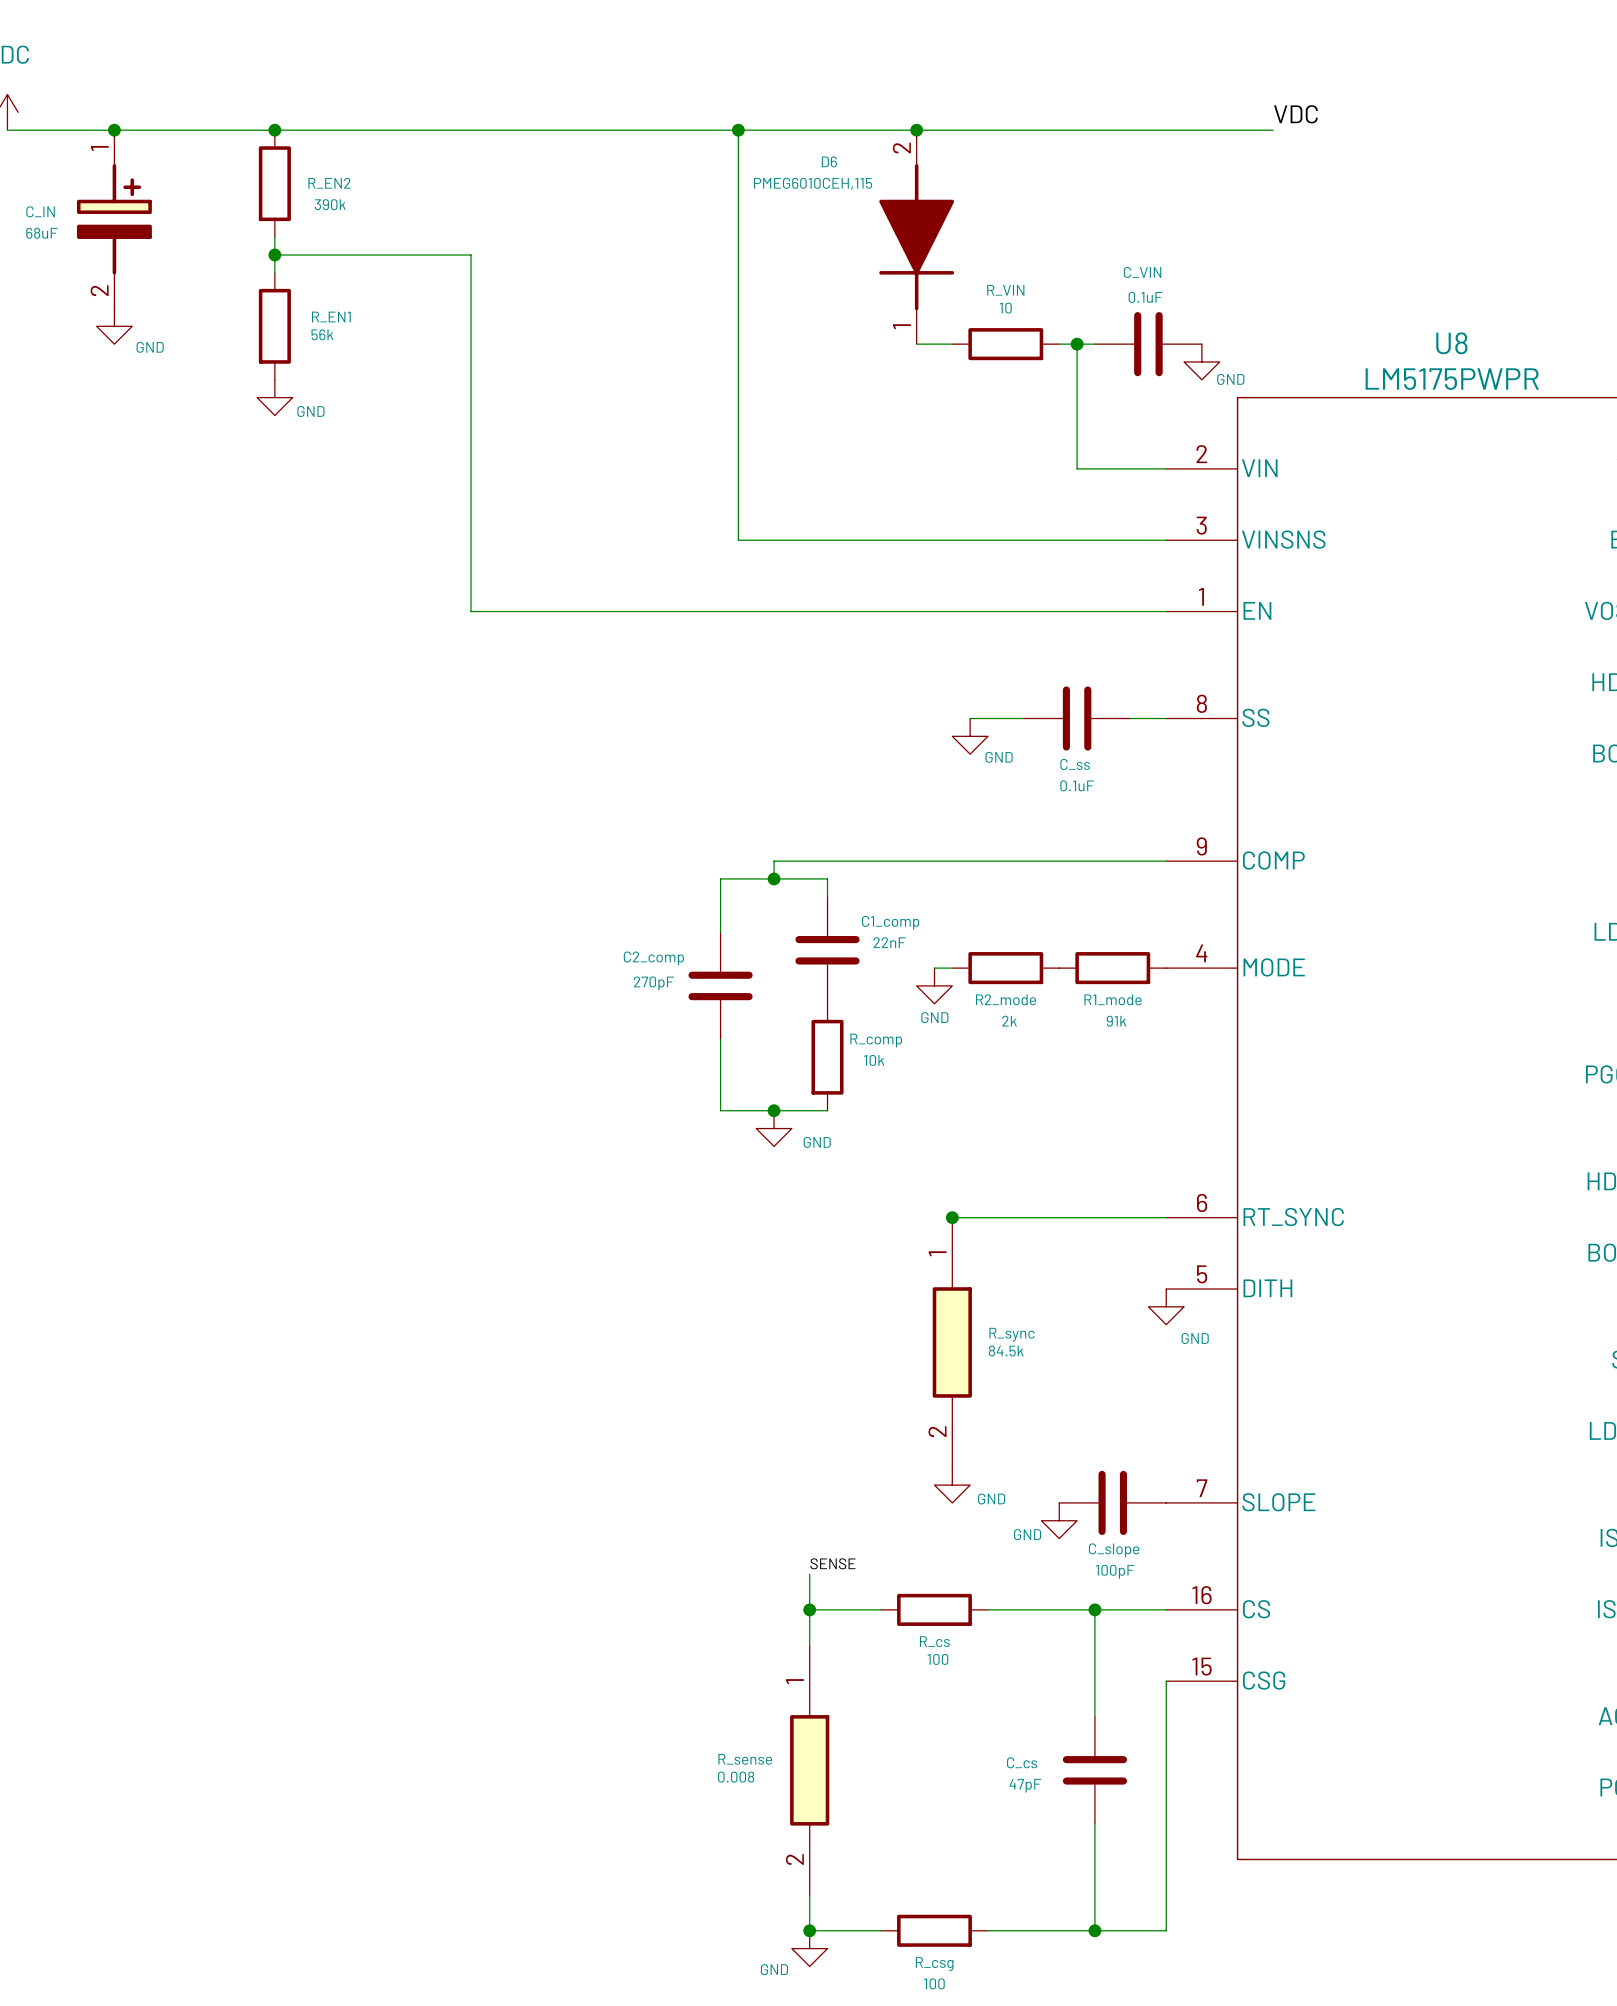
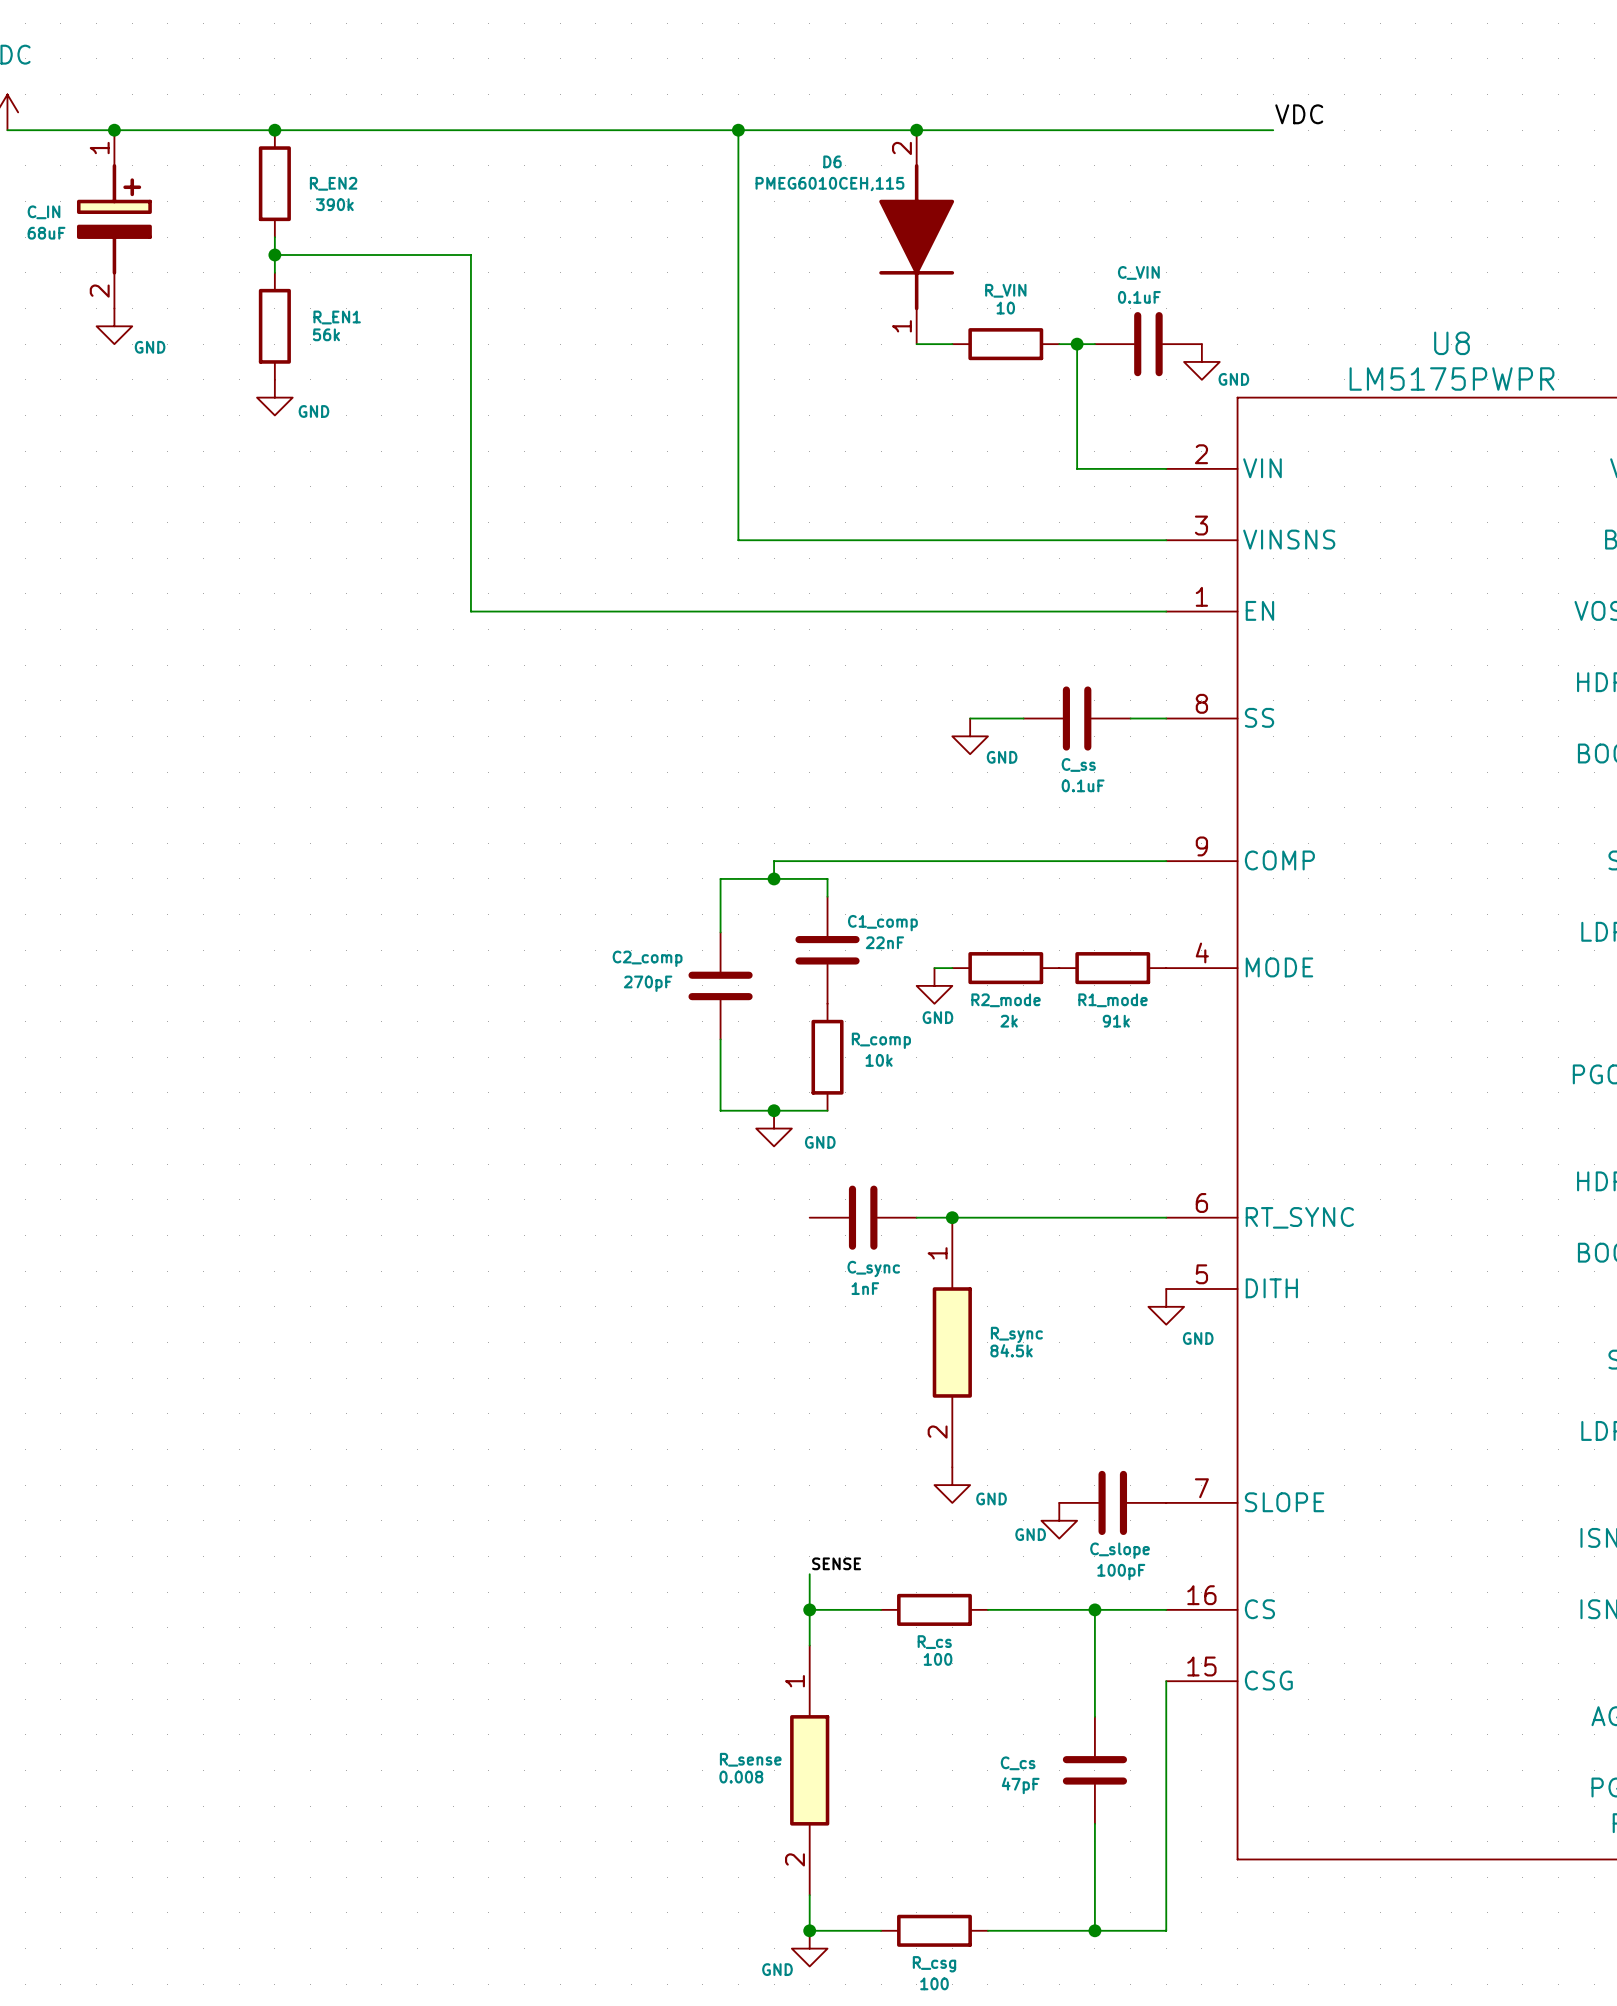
C_sync: none -> 1nF (863, 1217)
wire: none -> (916, 1217) (952, 1217)

